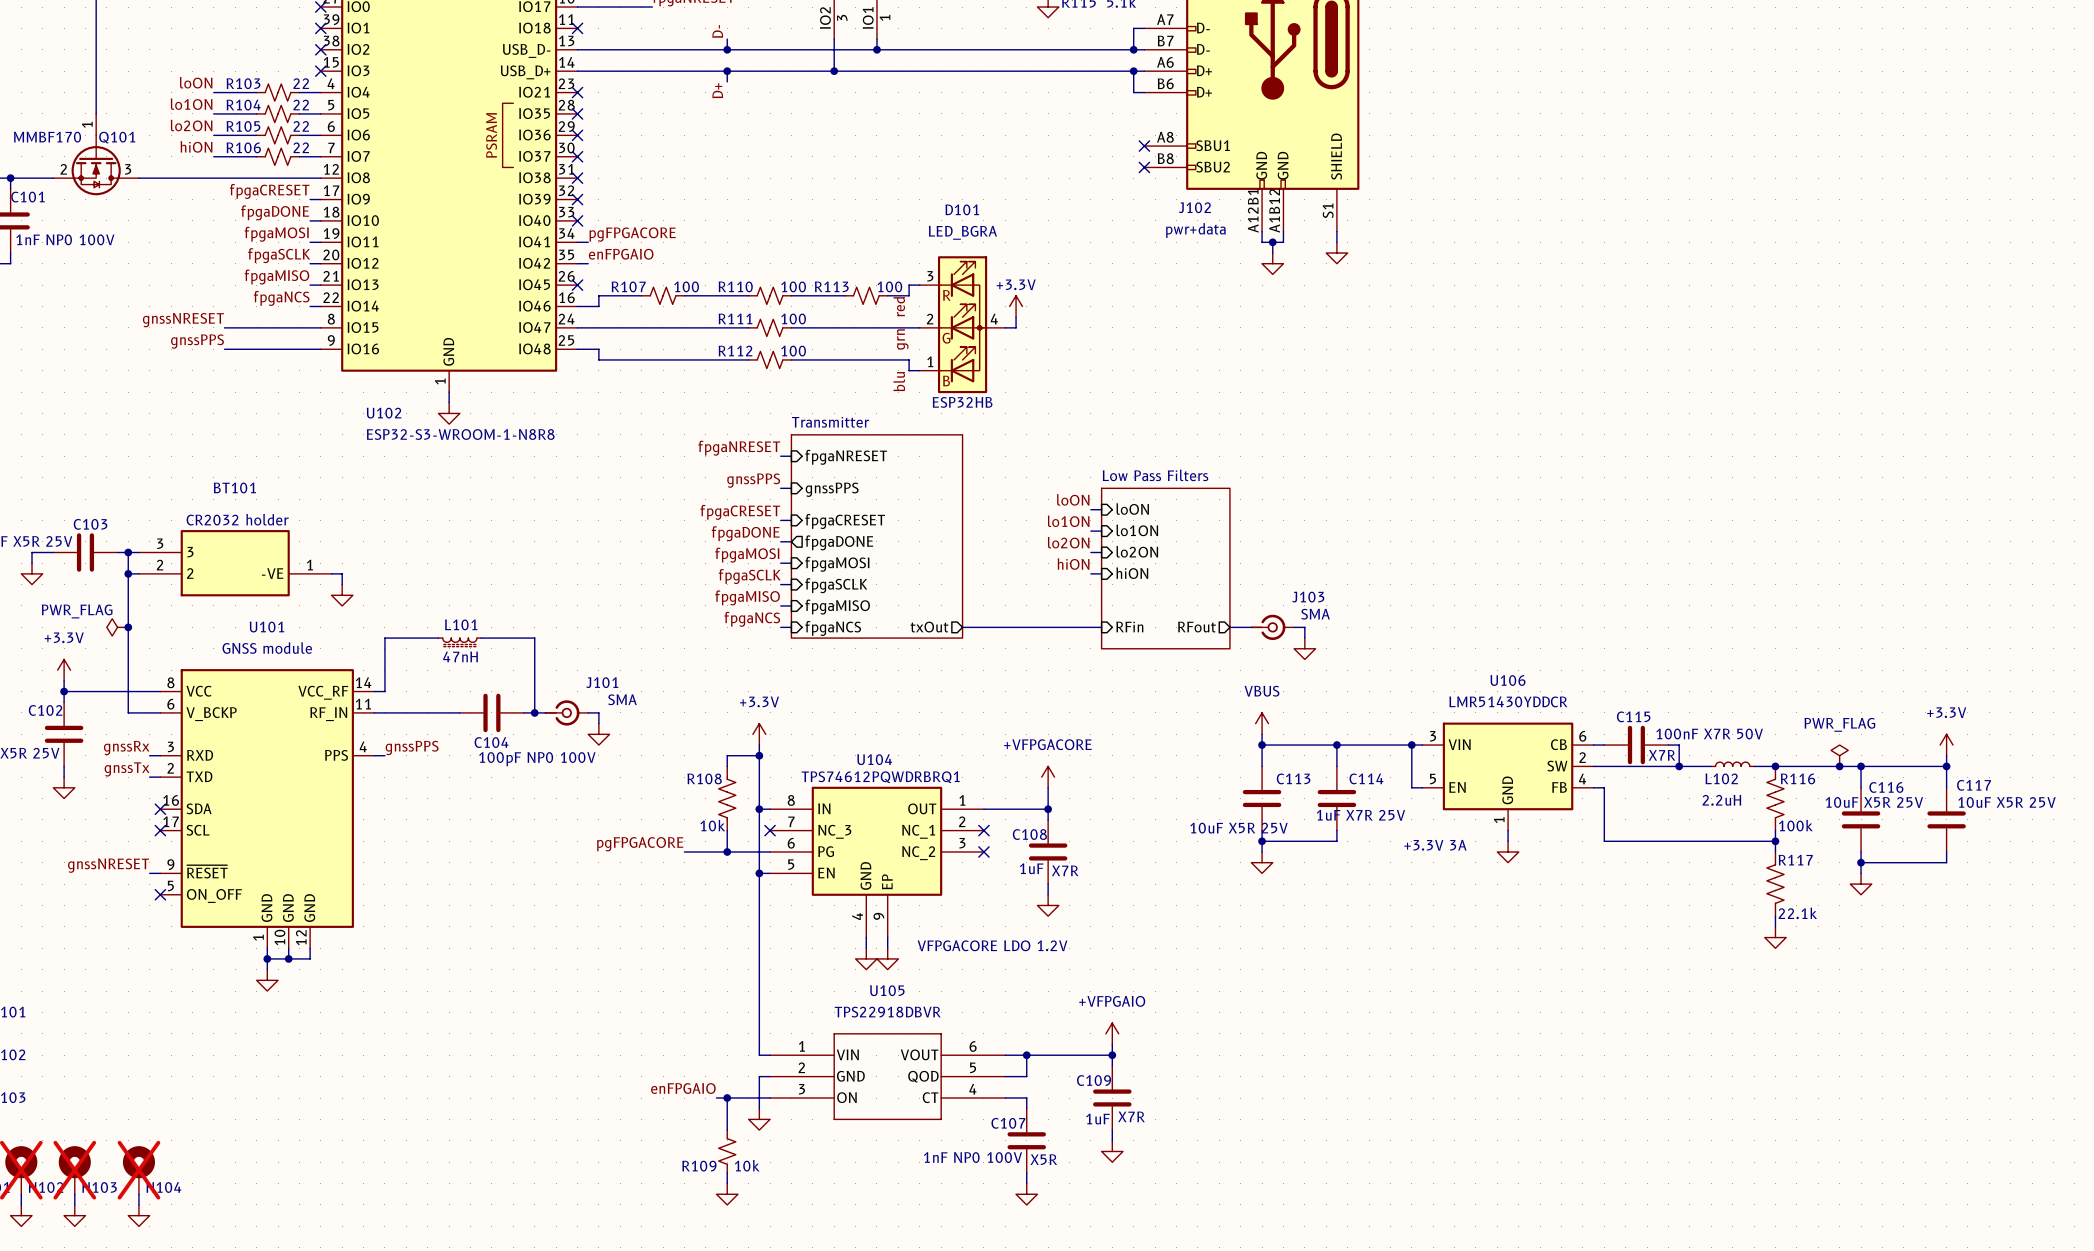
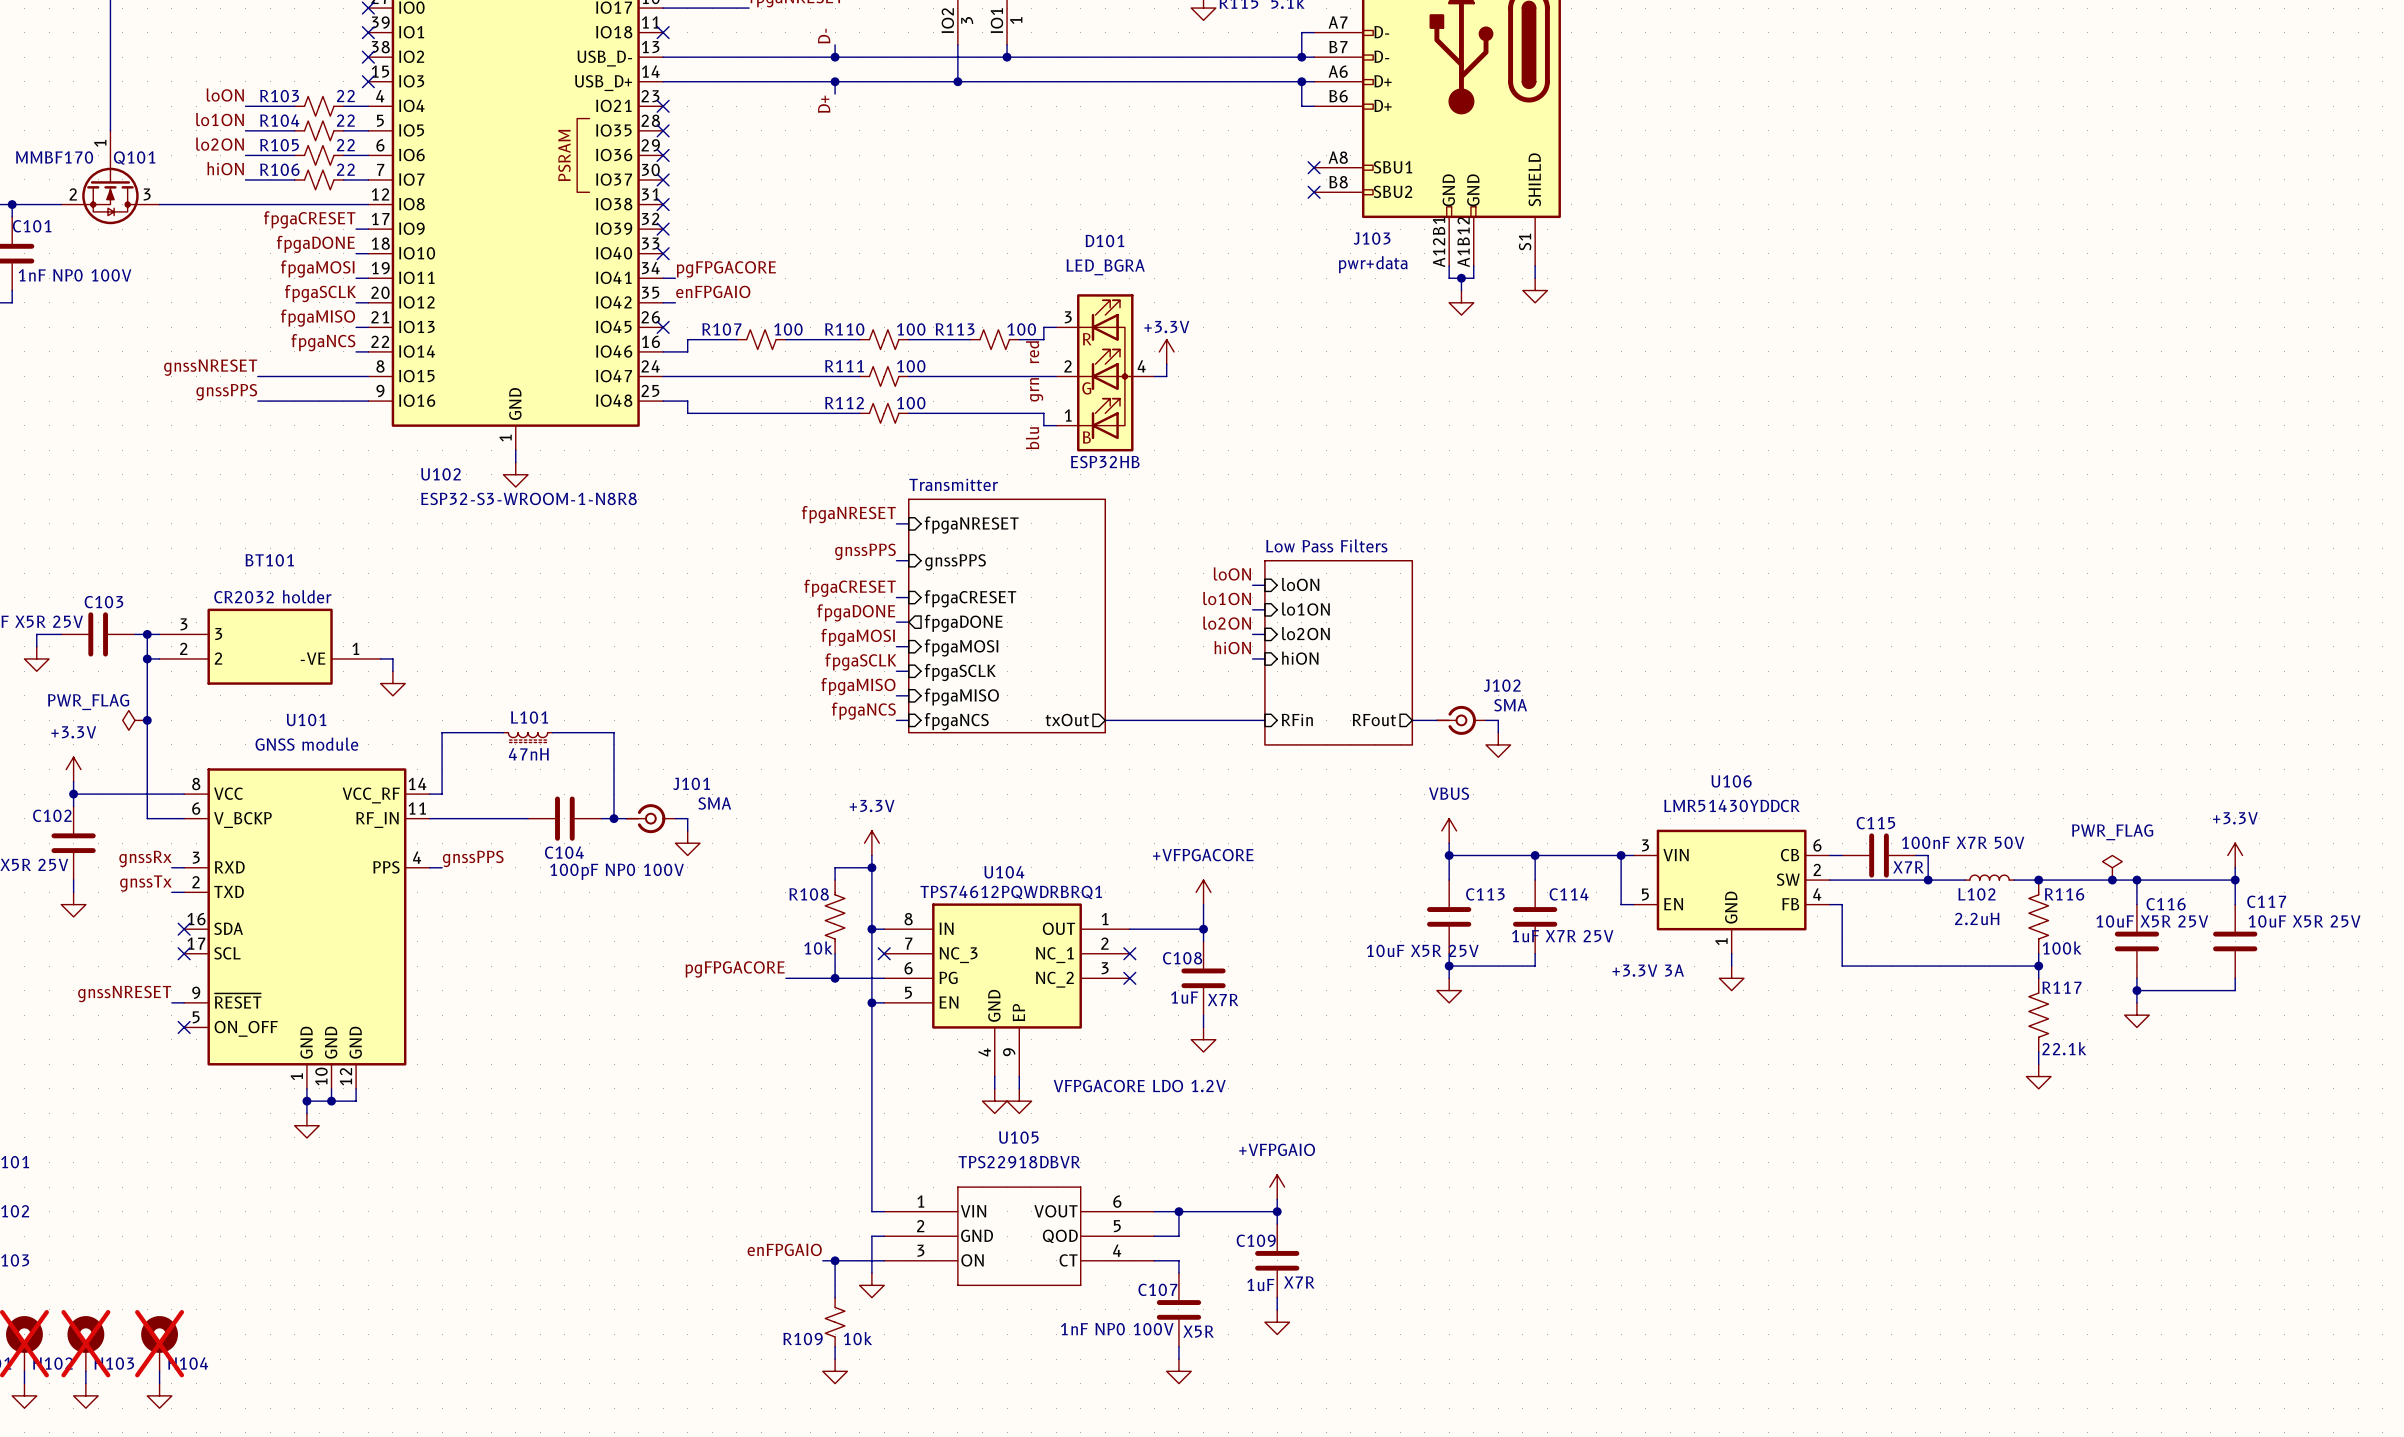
J102 name: J102 (1194, 207) -> J103 (1372, 238)
J103 name: J103 (1308, 597) -> J102 (1502, 685)

